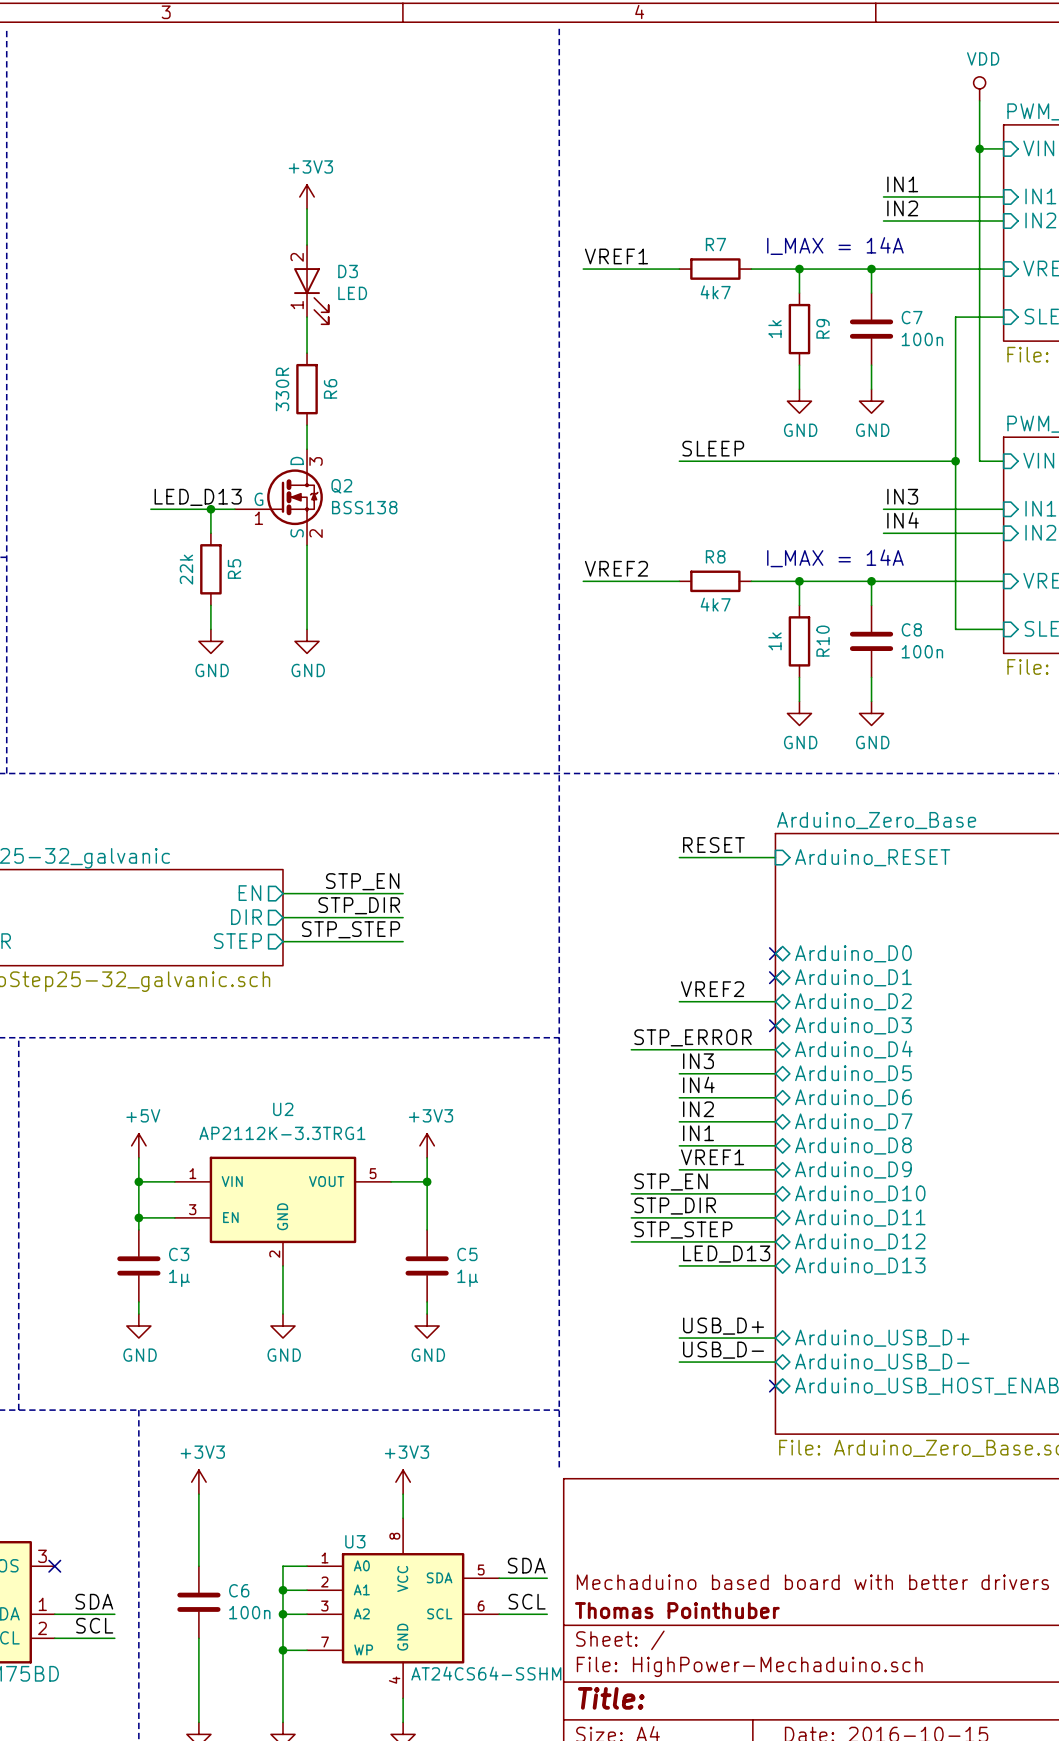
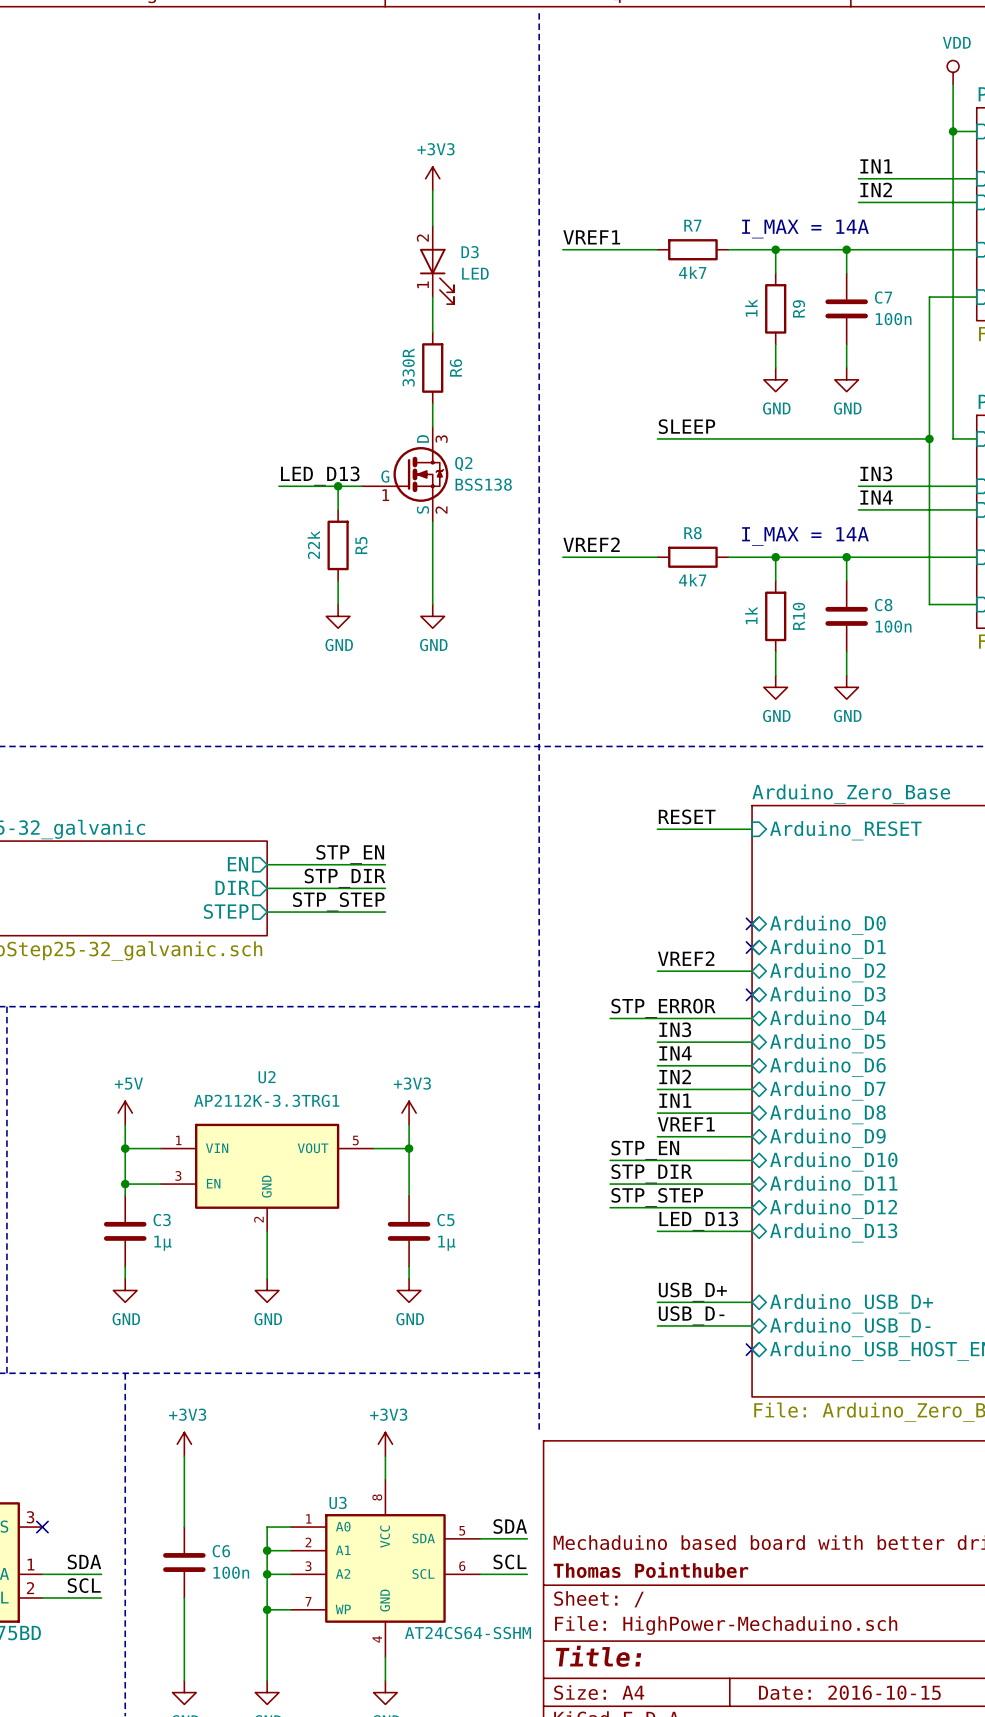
power symbol position: +3V3 (307, 196) -> +3V3 (432, 178)
wire: (307, 208) (307, 245) -> (432, 190) (432, 226)
D3 position: (311, 284) -> (436, 265)
wire: (307, 317) (307, 353) -> (432, 297) (432, 332)
R6 position: (307, 389) -> (432, 368)
wire: (307, 425) (307, 449) -> (432, 403) (432, 427)
label position: LED_D13 (198, 497) -> LED_D13 (320, 476)
Q2 position: (278, 497) -> (405, 474)
wire: (150, 509) (234, 509) -> (278, 486) (361, 486)
wire: (210, 509) (210, 533) -> (338, 486) (338, 509)
junction: (210, 509) -> none
junction: none -> (338, 486)
wire: (307, 545) (307, 629) -> (432, 521) (432, 604)
R5 position: (210, 569) -> (338, 545)
wire: (210, 605) (210, 629) -> (338, 580) (338, 604)
power symbol: GND (210, 641) -> none
power symbol position: GND (307, 641) -> GND (338, 616)
power symbol: none -> GND (432, 616)

